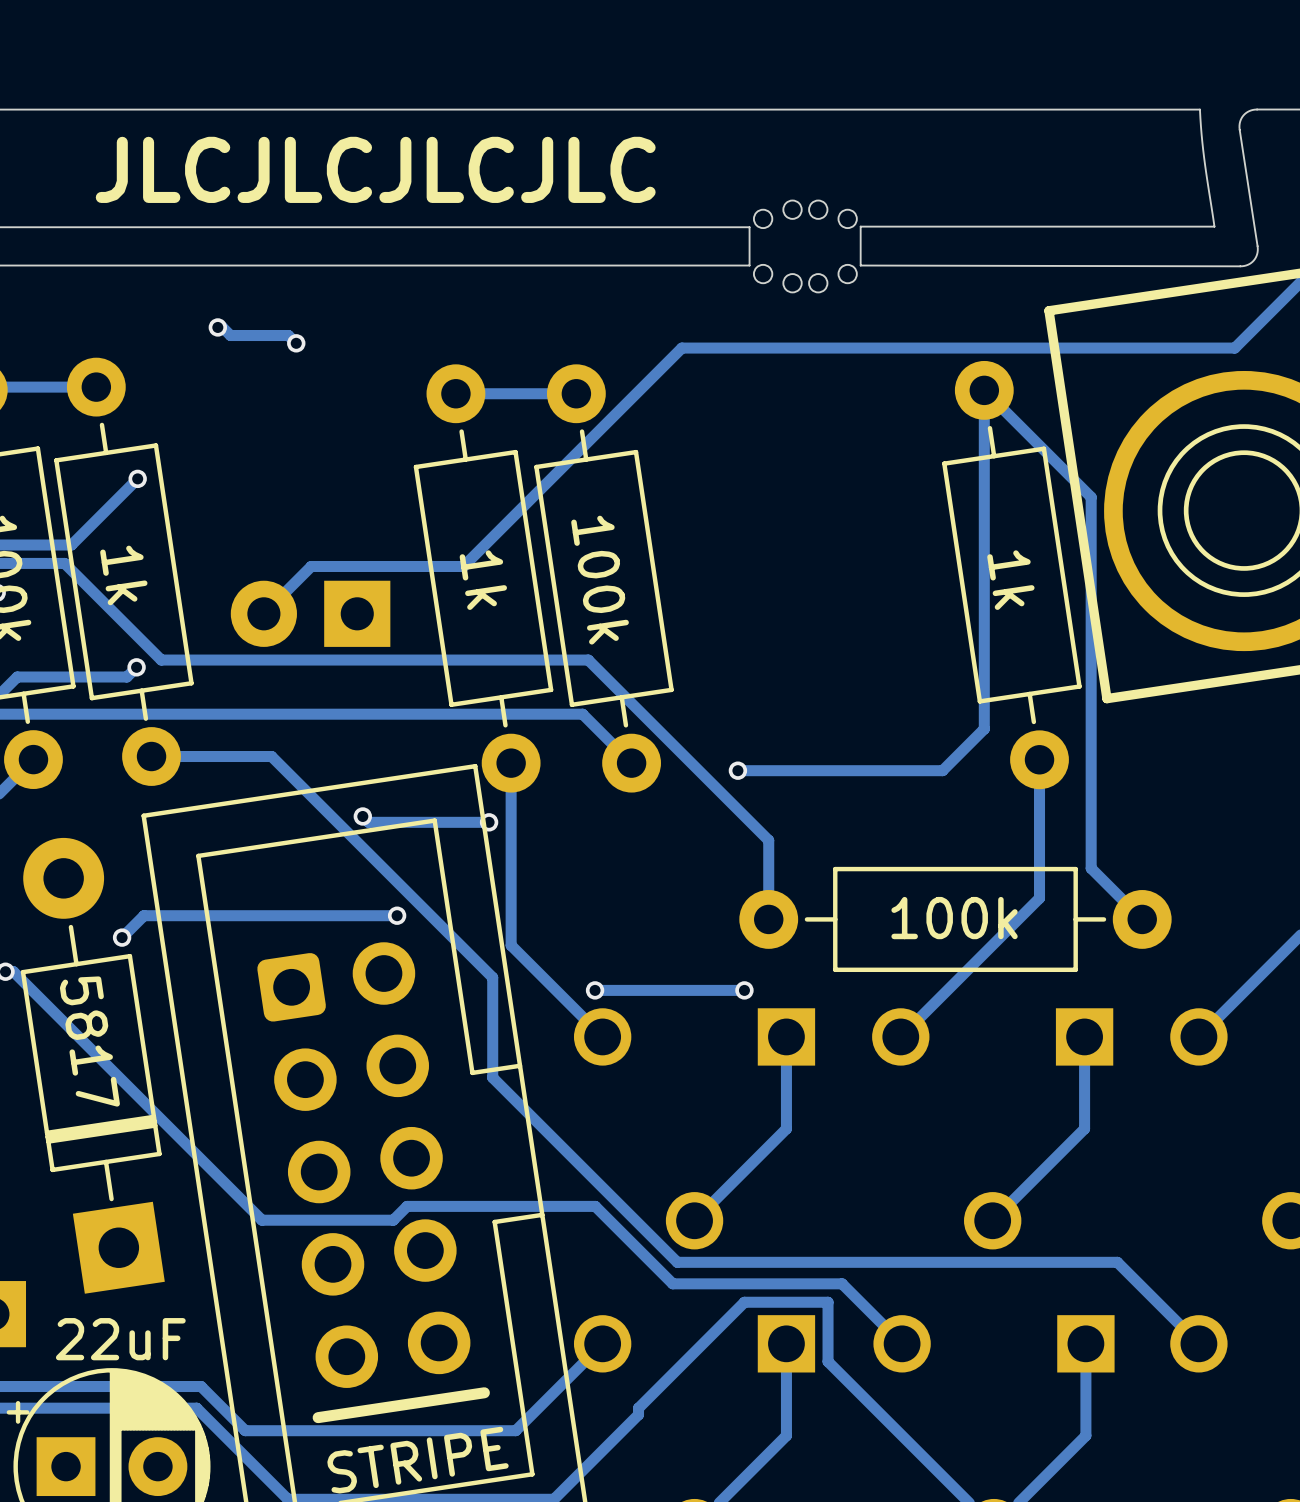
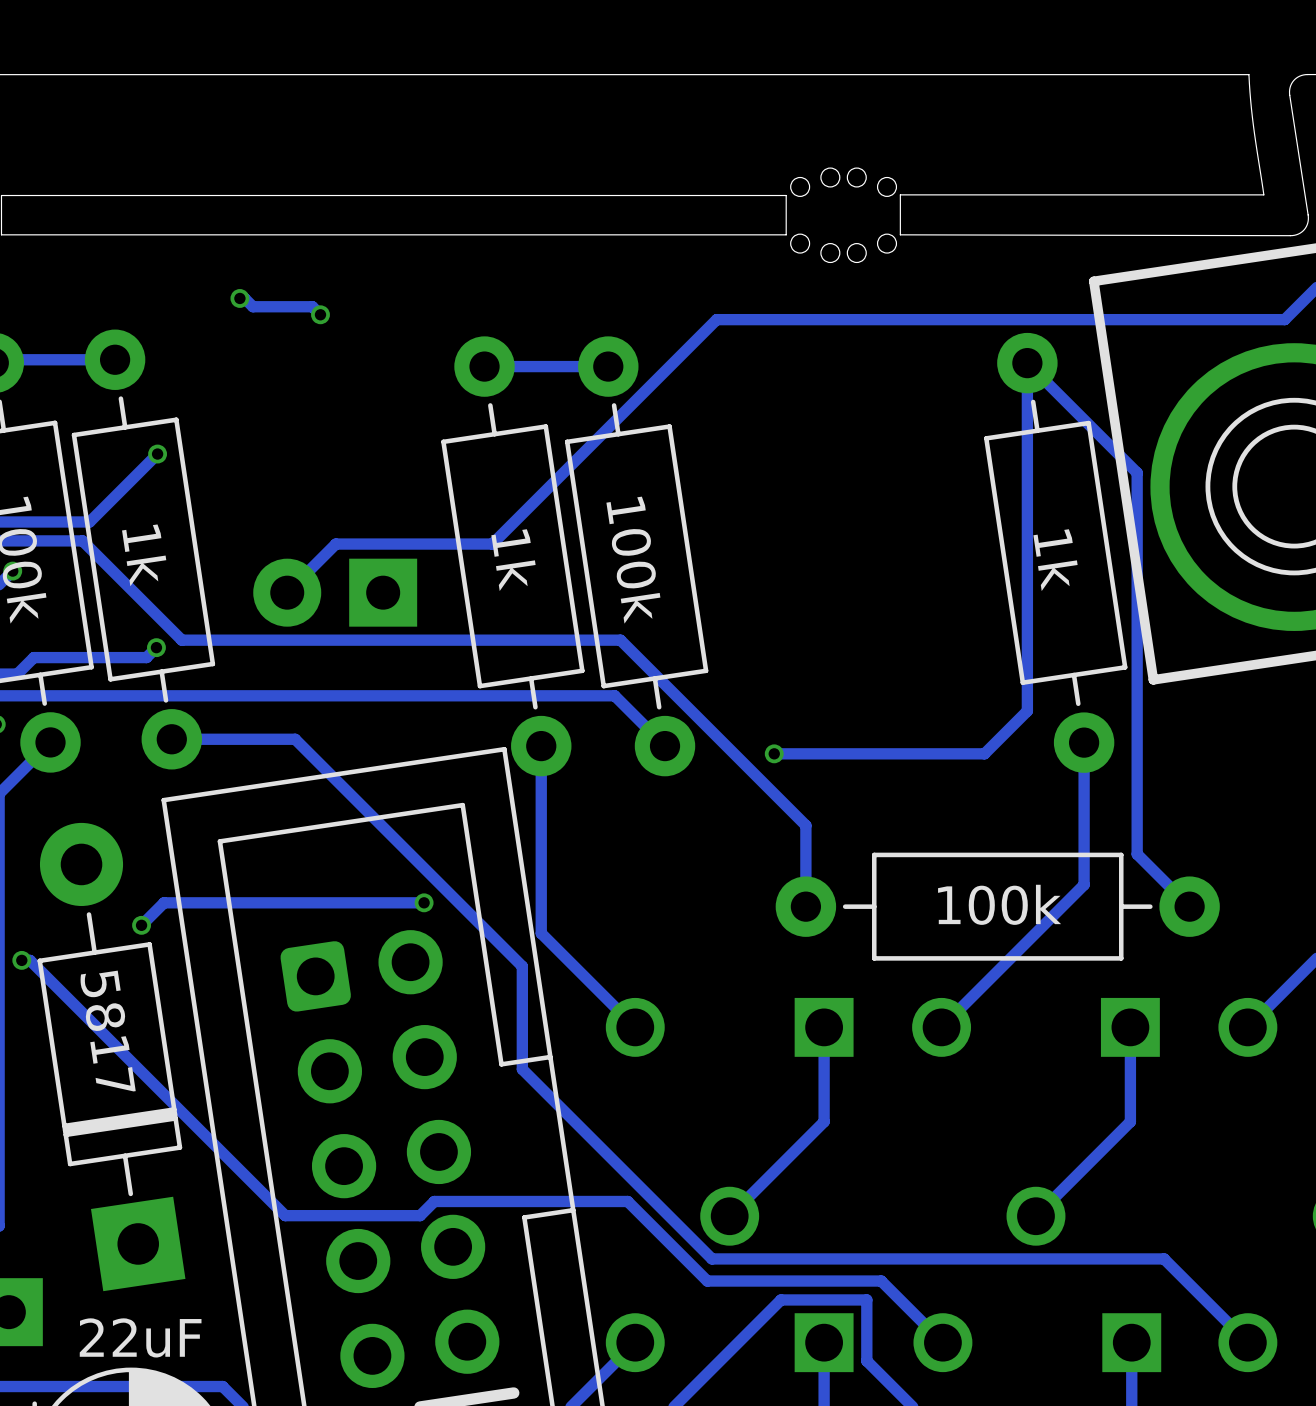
text: JLCJLCJLCJLC (375, 169) -> none
track: (362, 816) (368, 822) (489, 822) -> none
via: (362, 816) -> none
via: (489, 822) -> none
via: (595, 990) -> none
track: (744, 990) (595, 990) -> none
via: (744, 990) -> none

